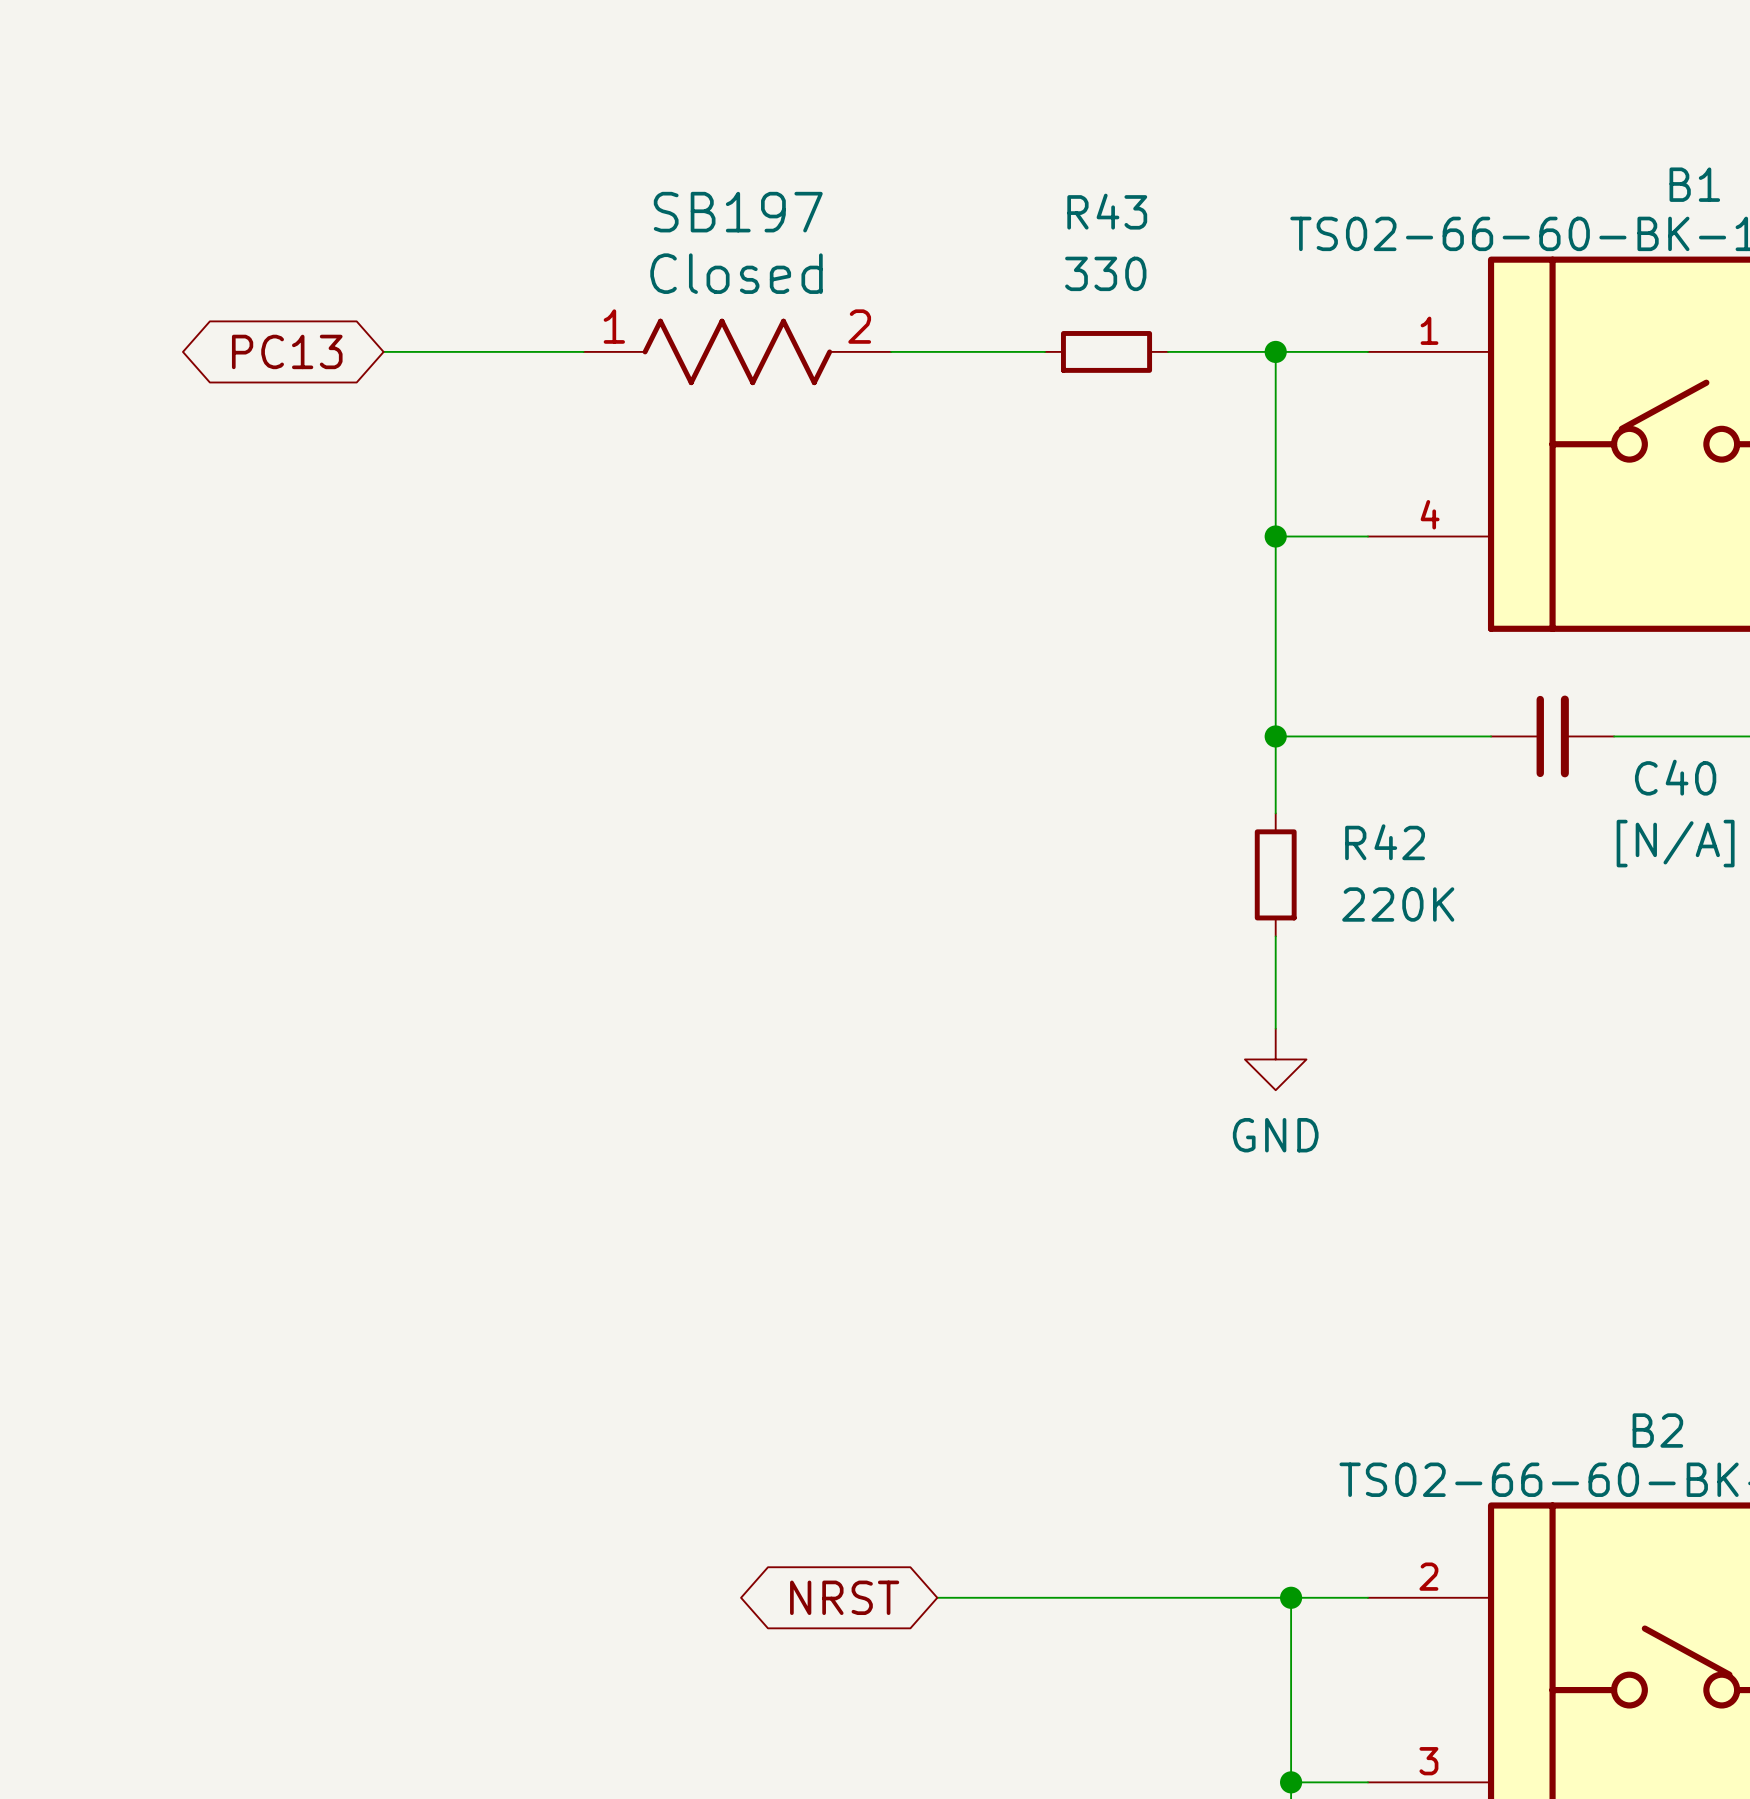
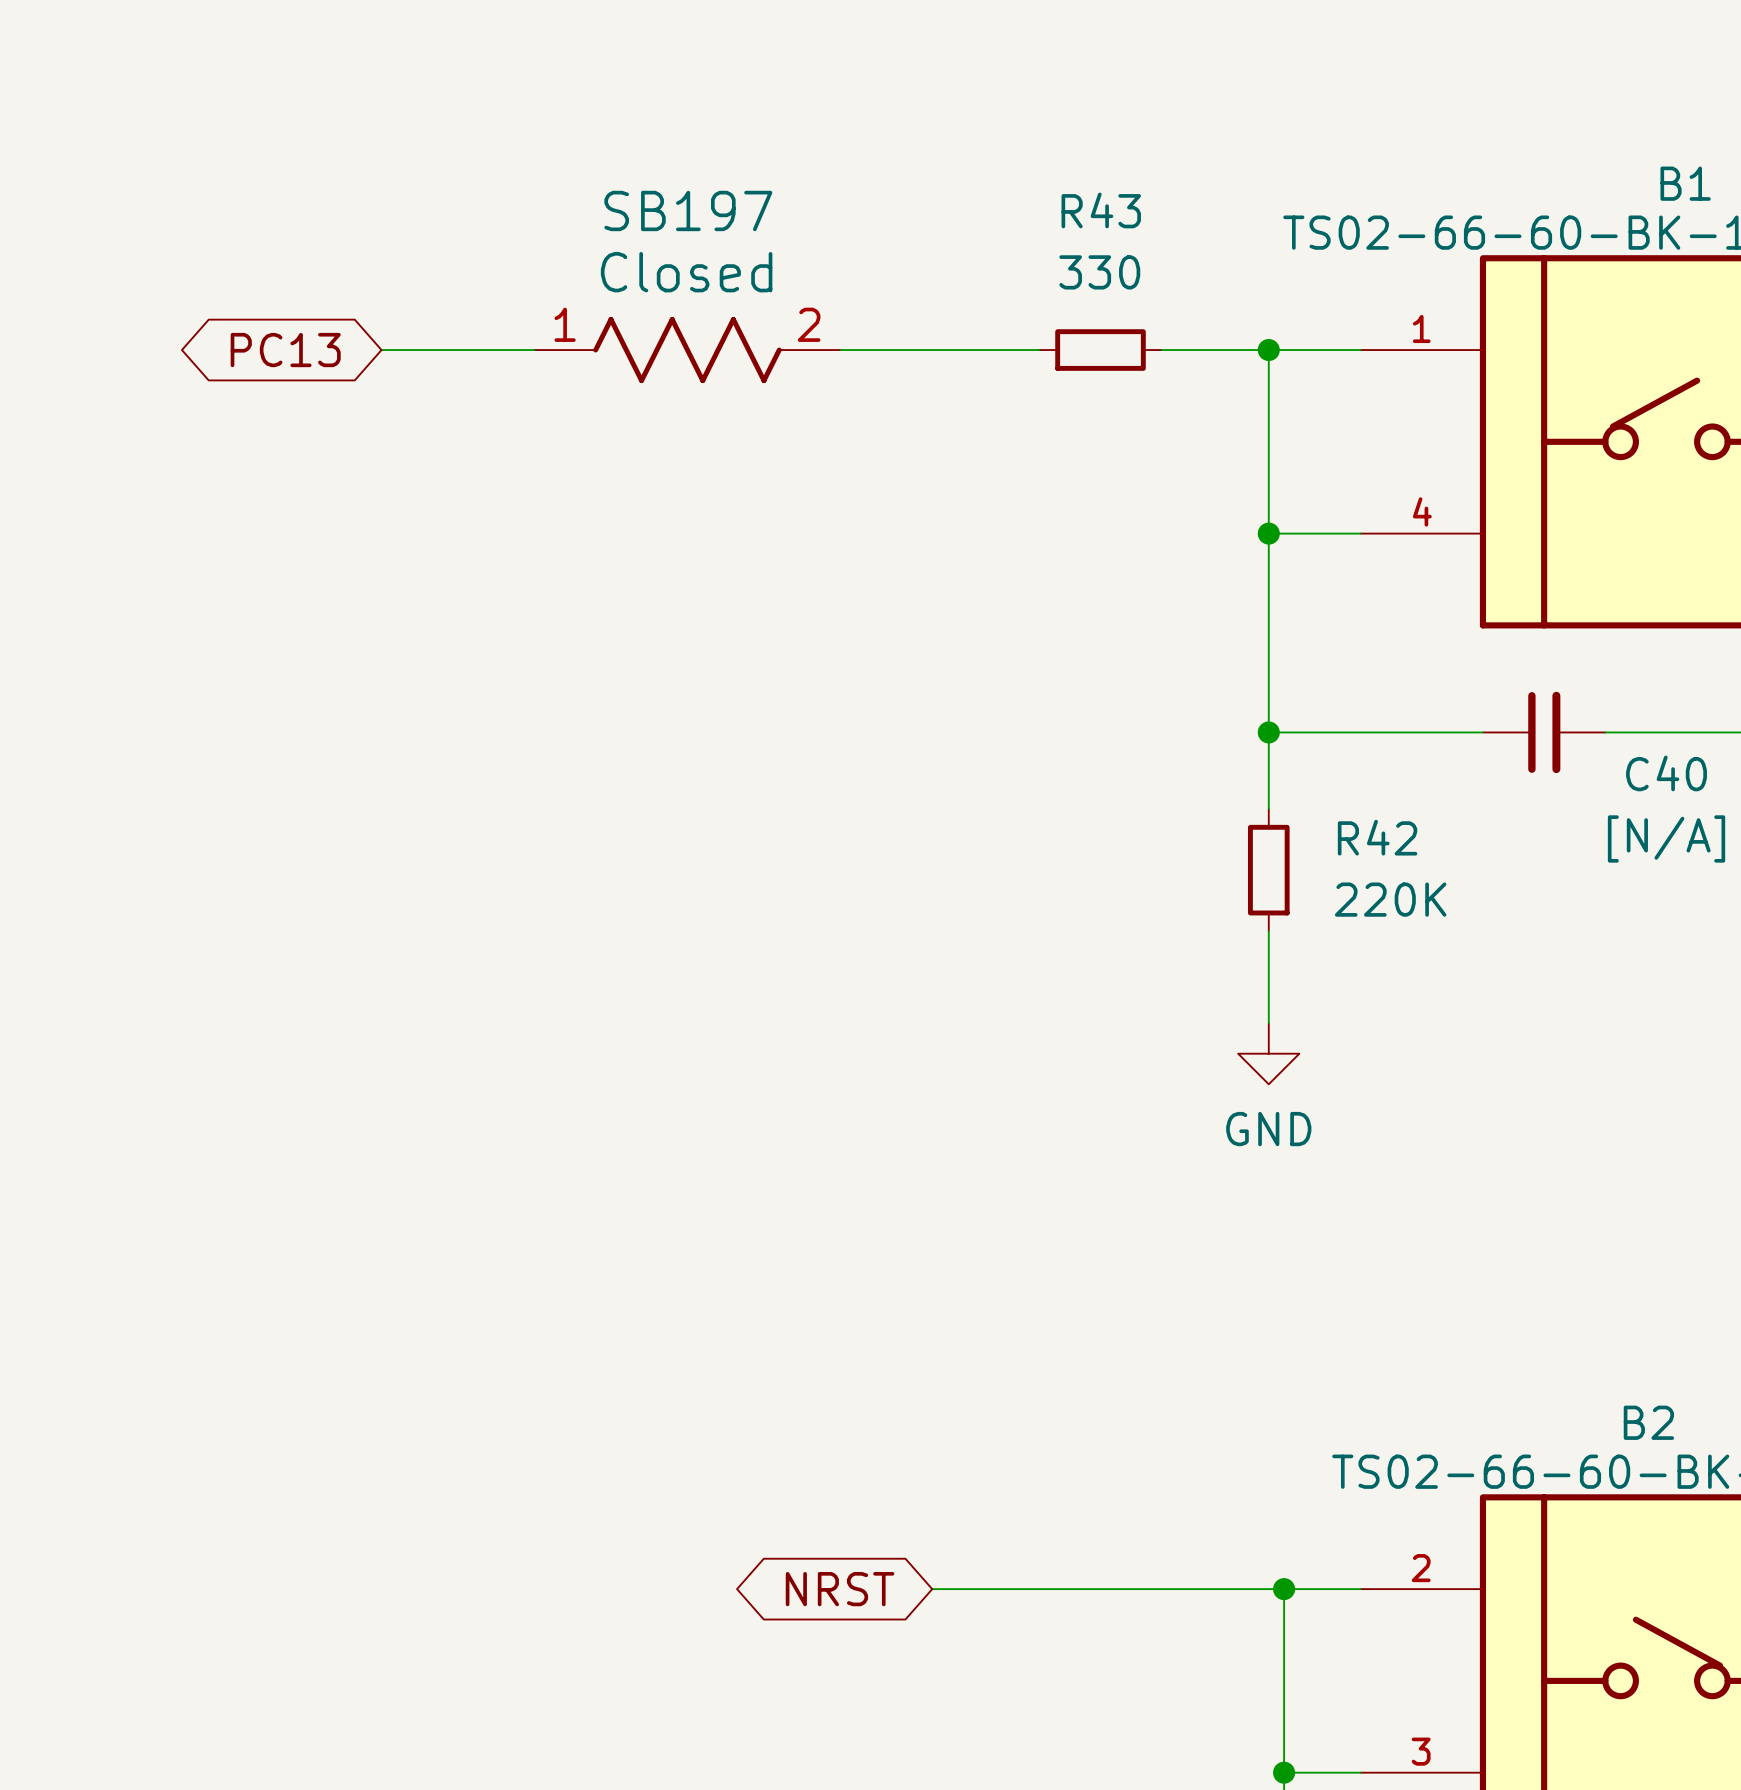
SB197 position: (737, 351) -> (687, 350)

